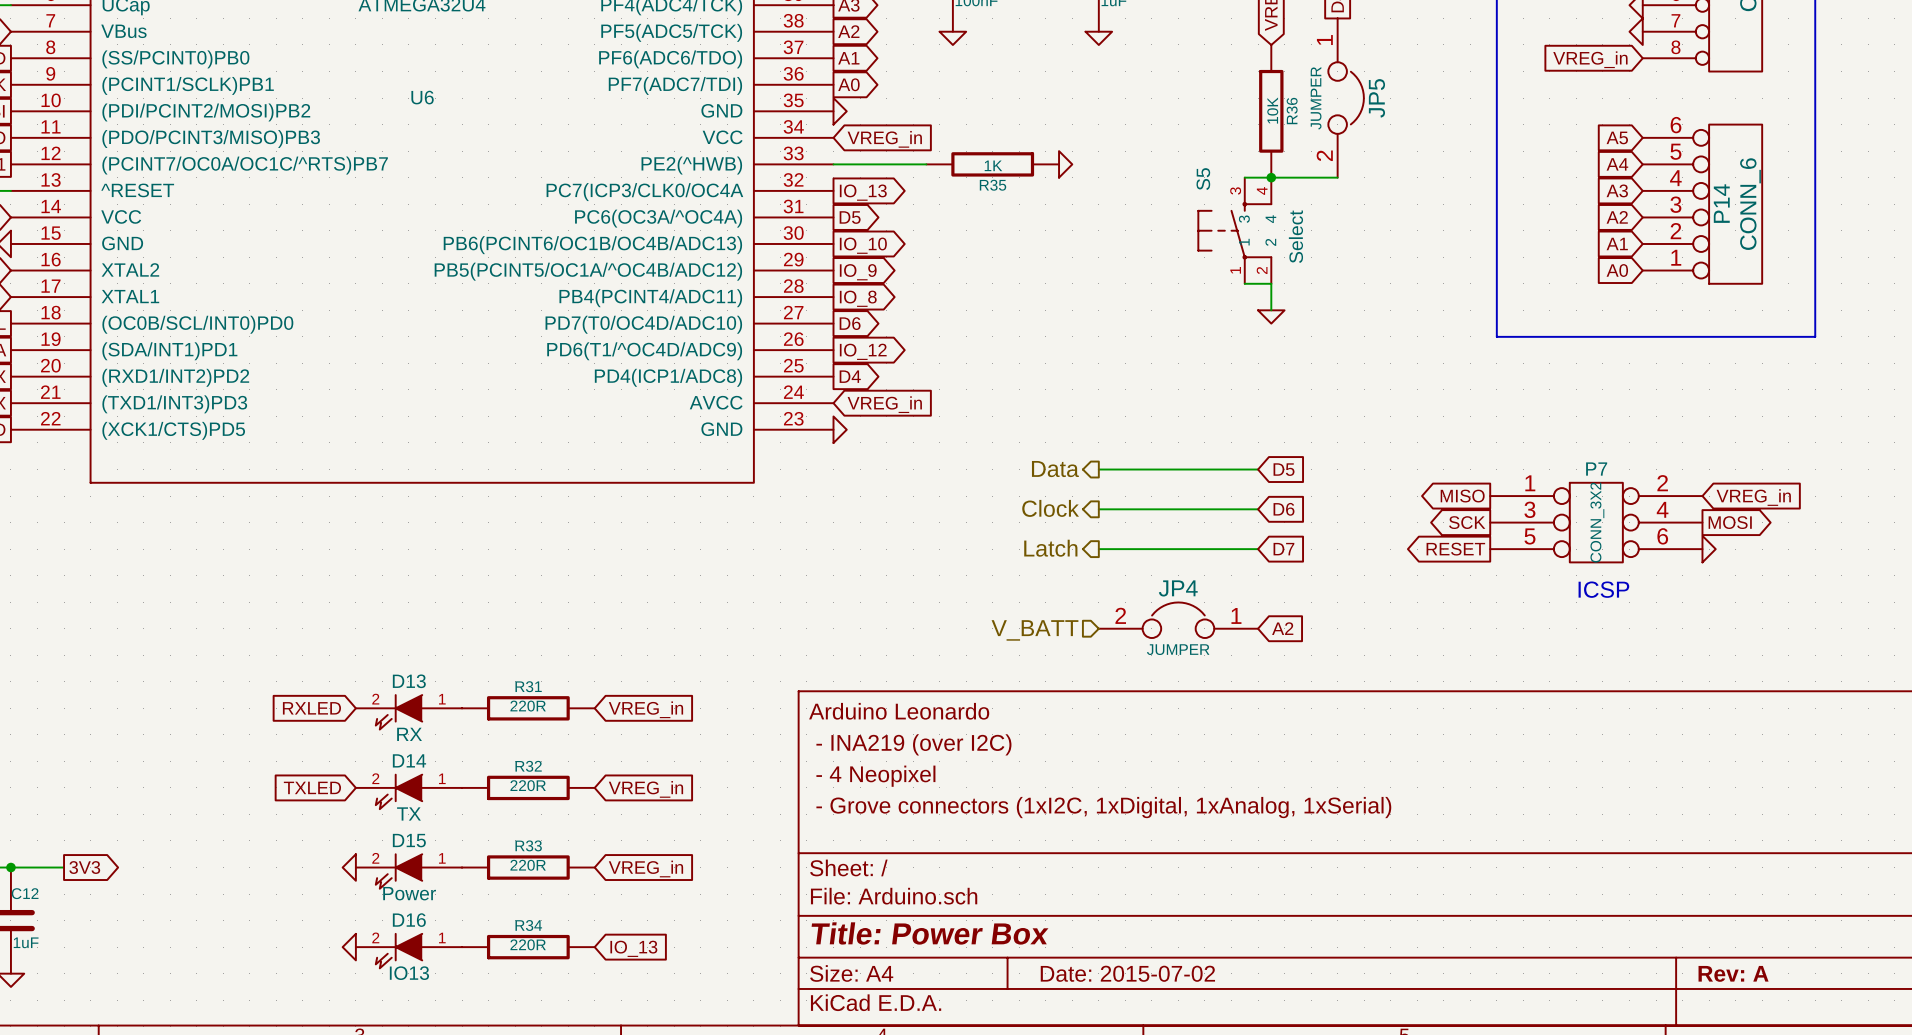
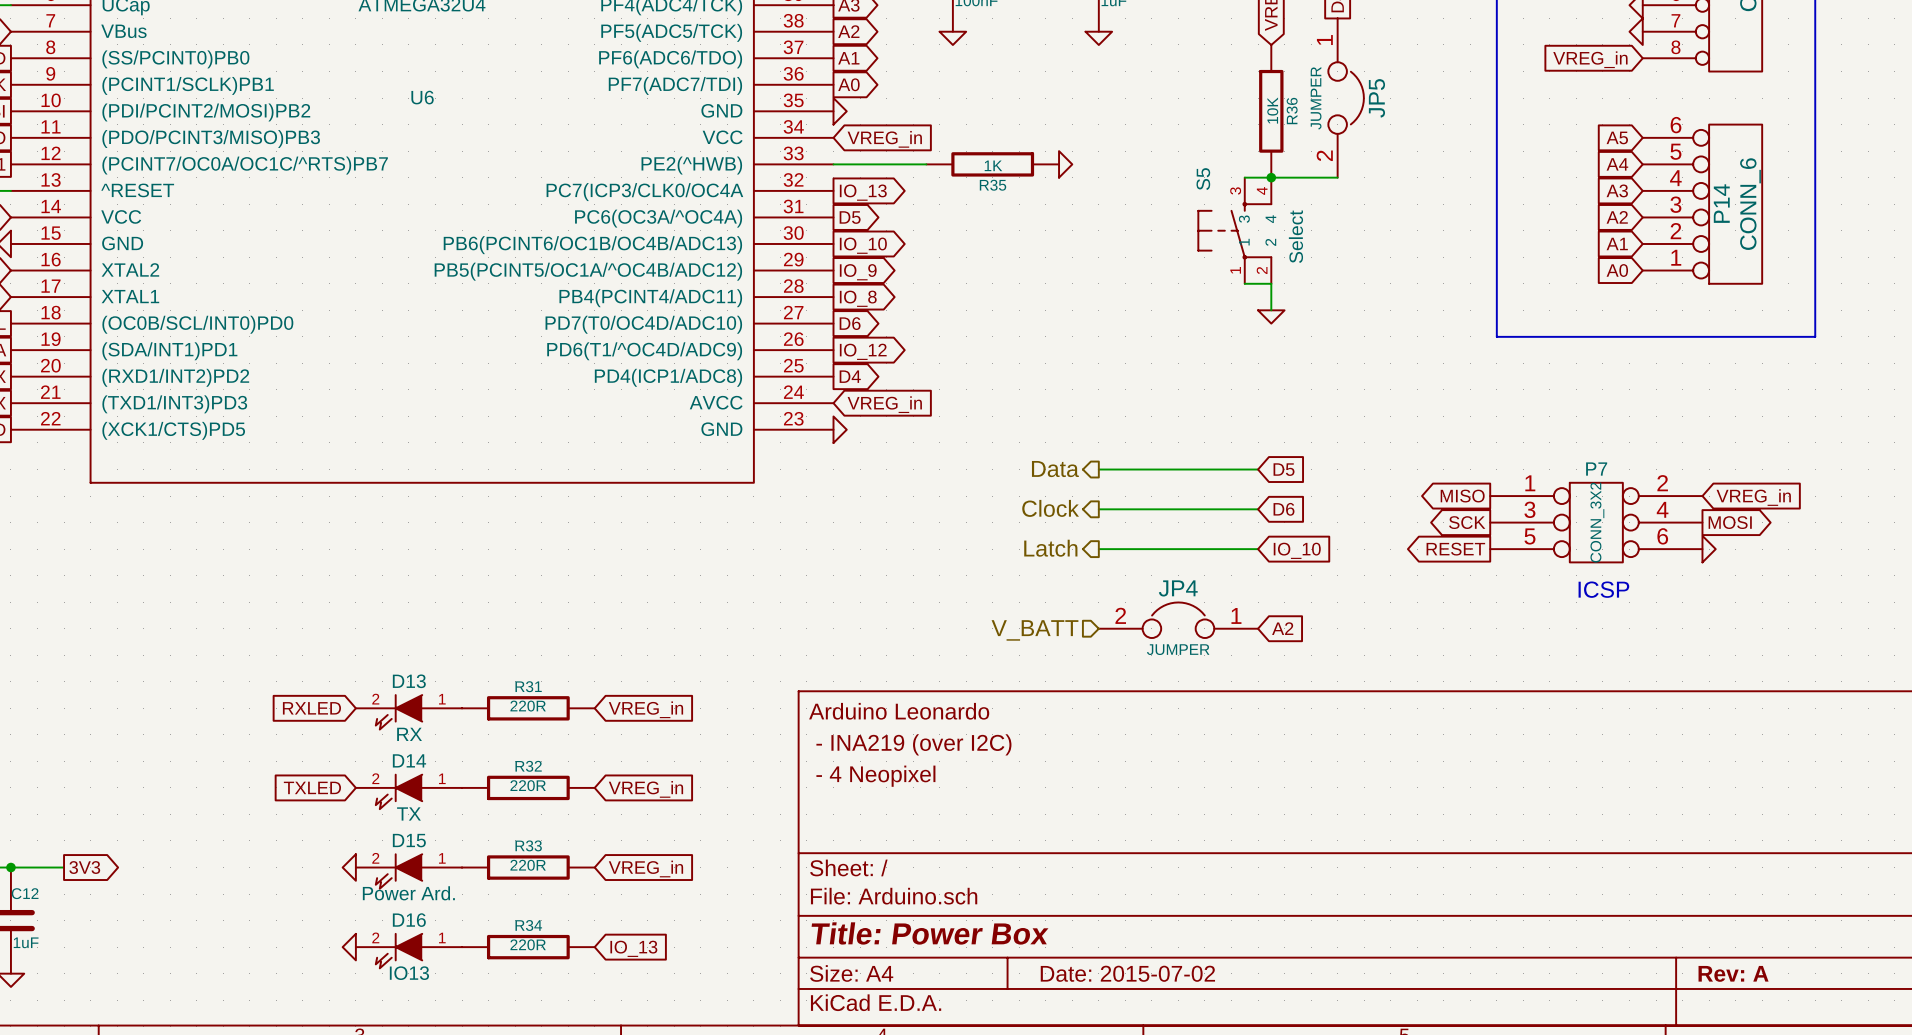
global label: D7 (1283, 549) -> IO_10 (1297, 550)
title block: - Grove connectors (1xI2C, 1xDigital, 1xAnalog, 1xSerial) (1103, 807) -> none
D15 value: Power (409, 893) -> Power Ard. (408, 893)

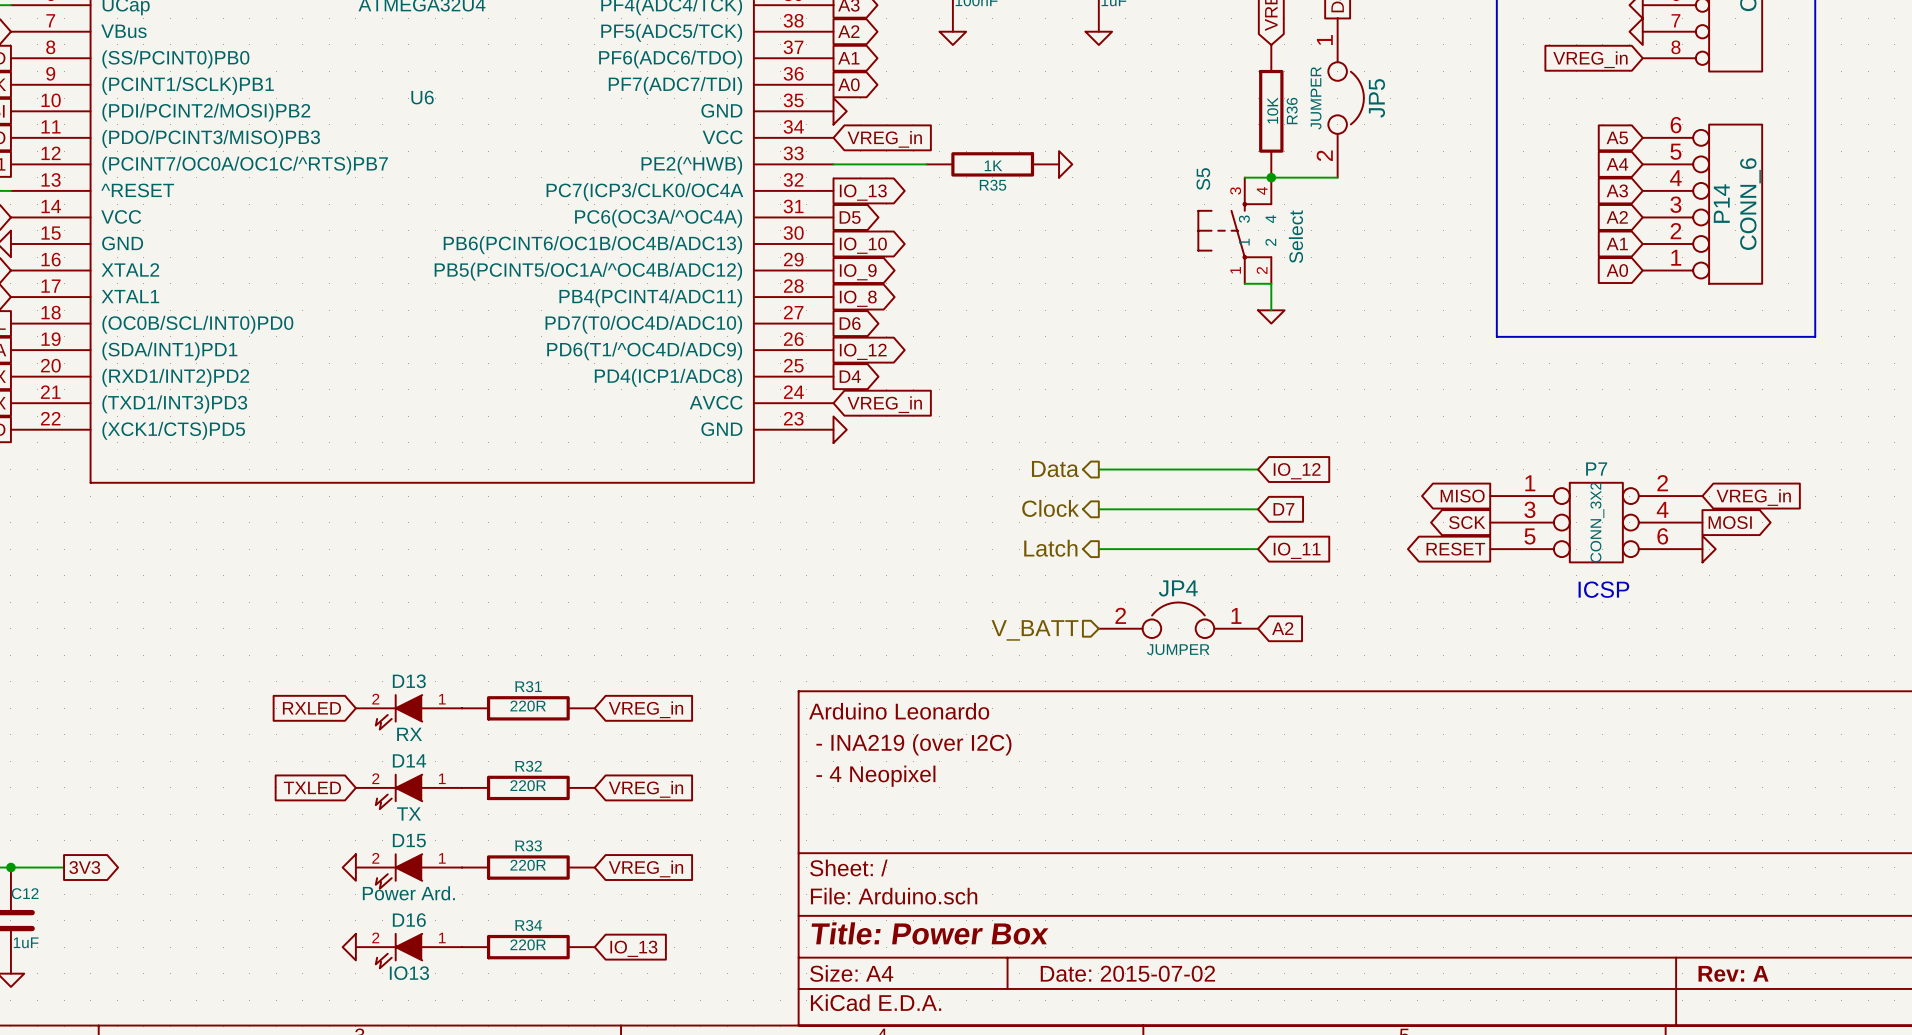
global label: D5 (1284, 469) -> IO_12 (1297, 471)
global label: D6 (1283, 509) -> D7 (1283, 509)
global label: IO_10 (1297, 550) -> IO_11 (1297, 550)

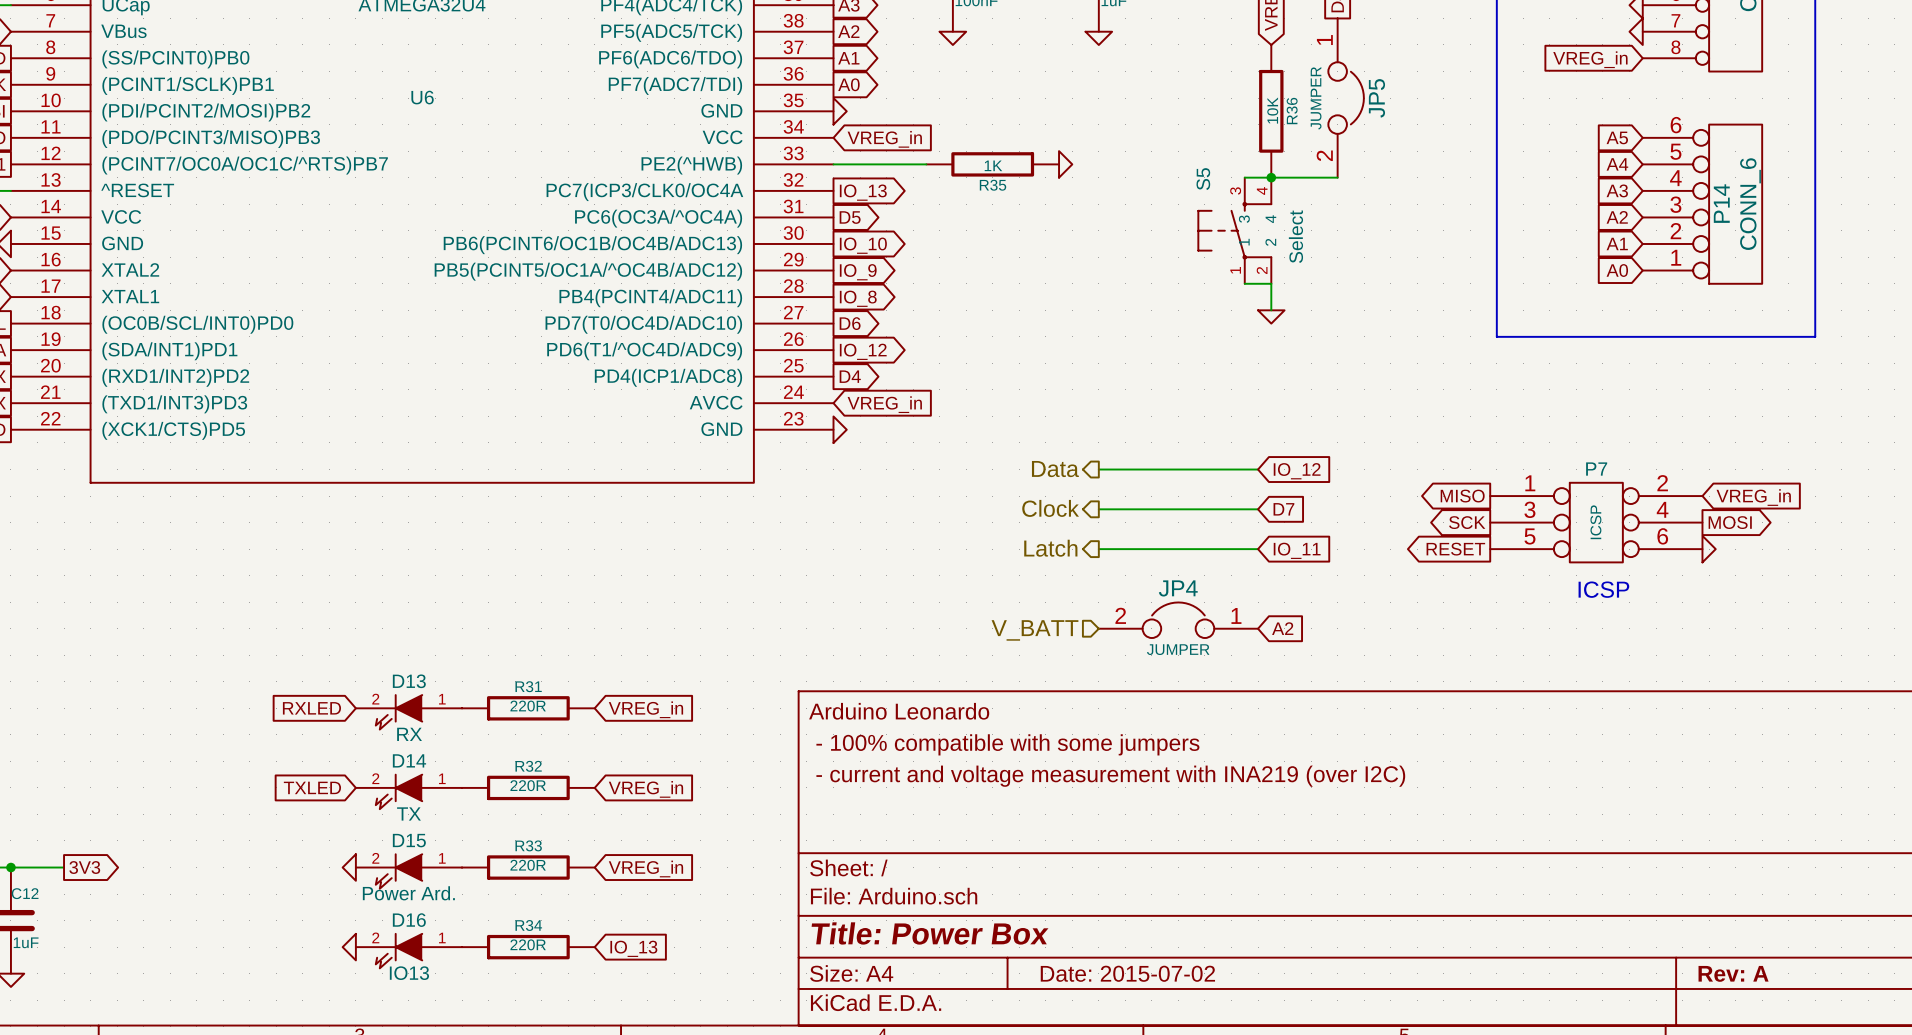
P7 value: CONN_3X2 (1597, 522) -> ICSP (1595, 522)
title block: - INA219 (over I2C) (913, 744) -> - 100% compatible with some jumpers (1007, 744)
title block: - 4 Neopixel (875, 776) -> - current and voltage measurement with INA219 (over I2C) (1110, 776)

